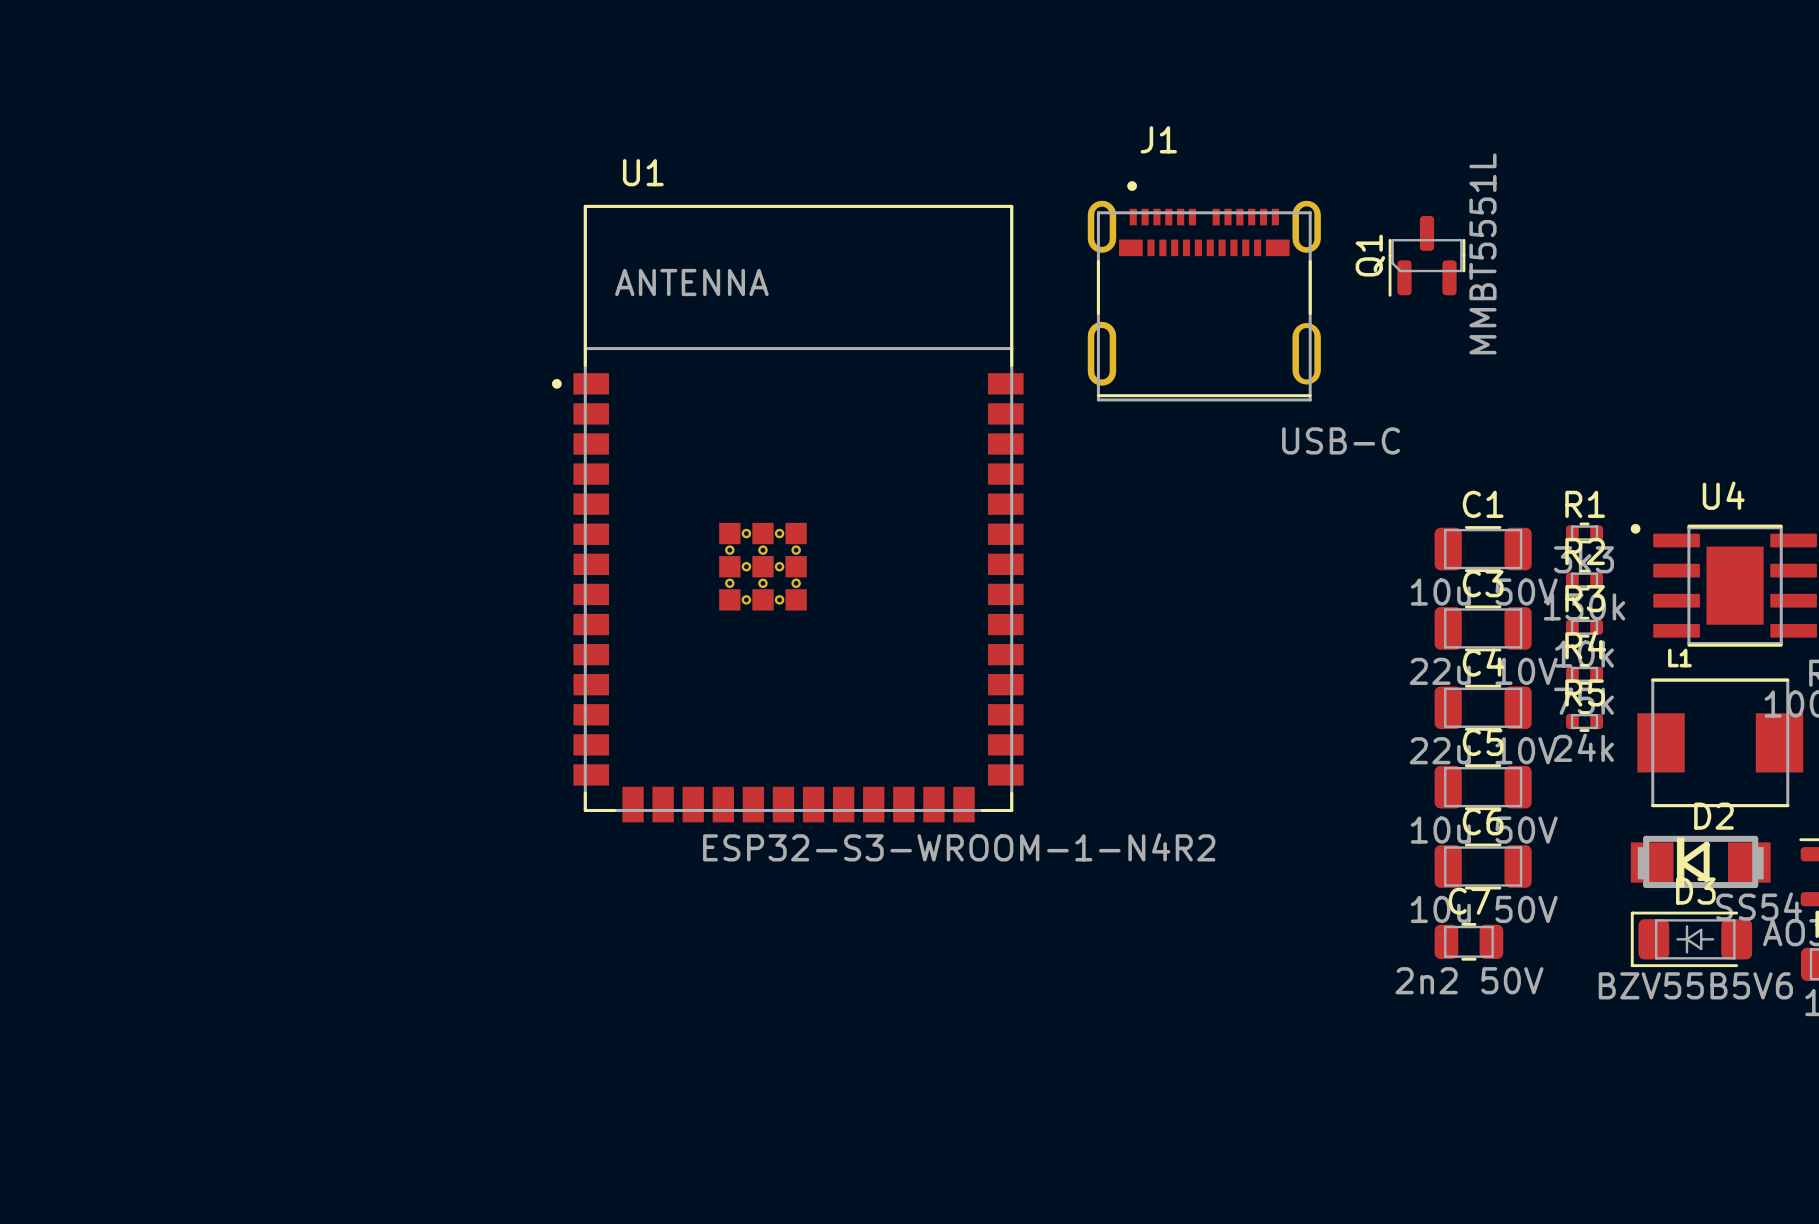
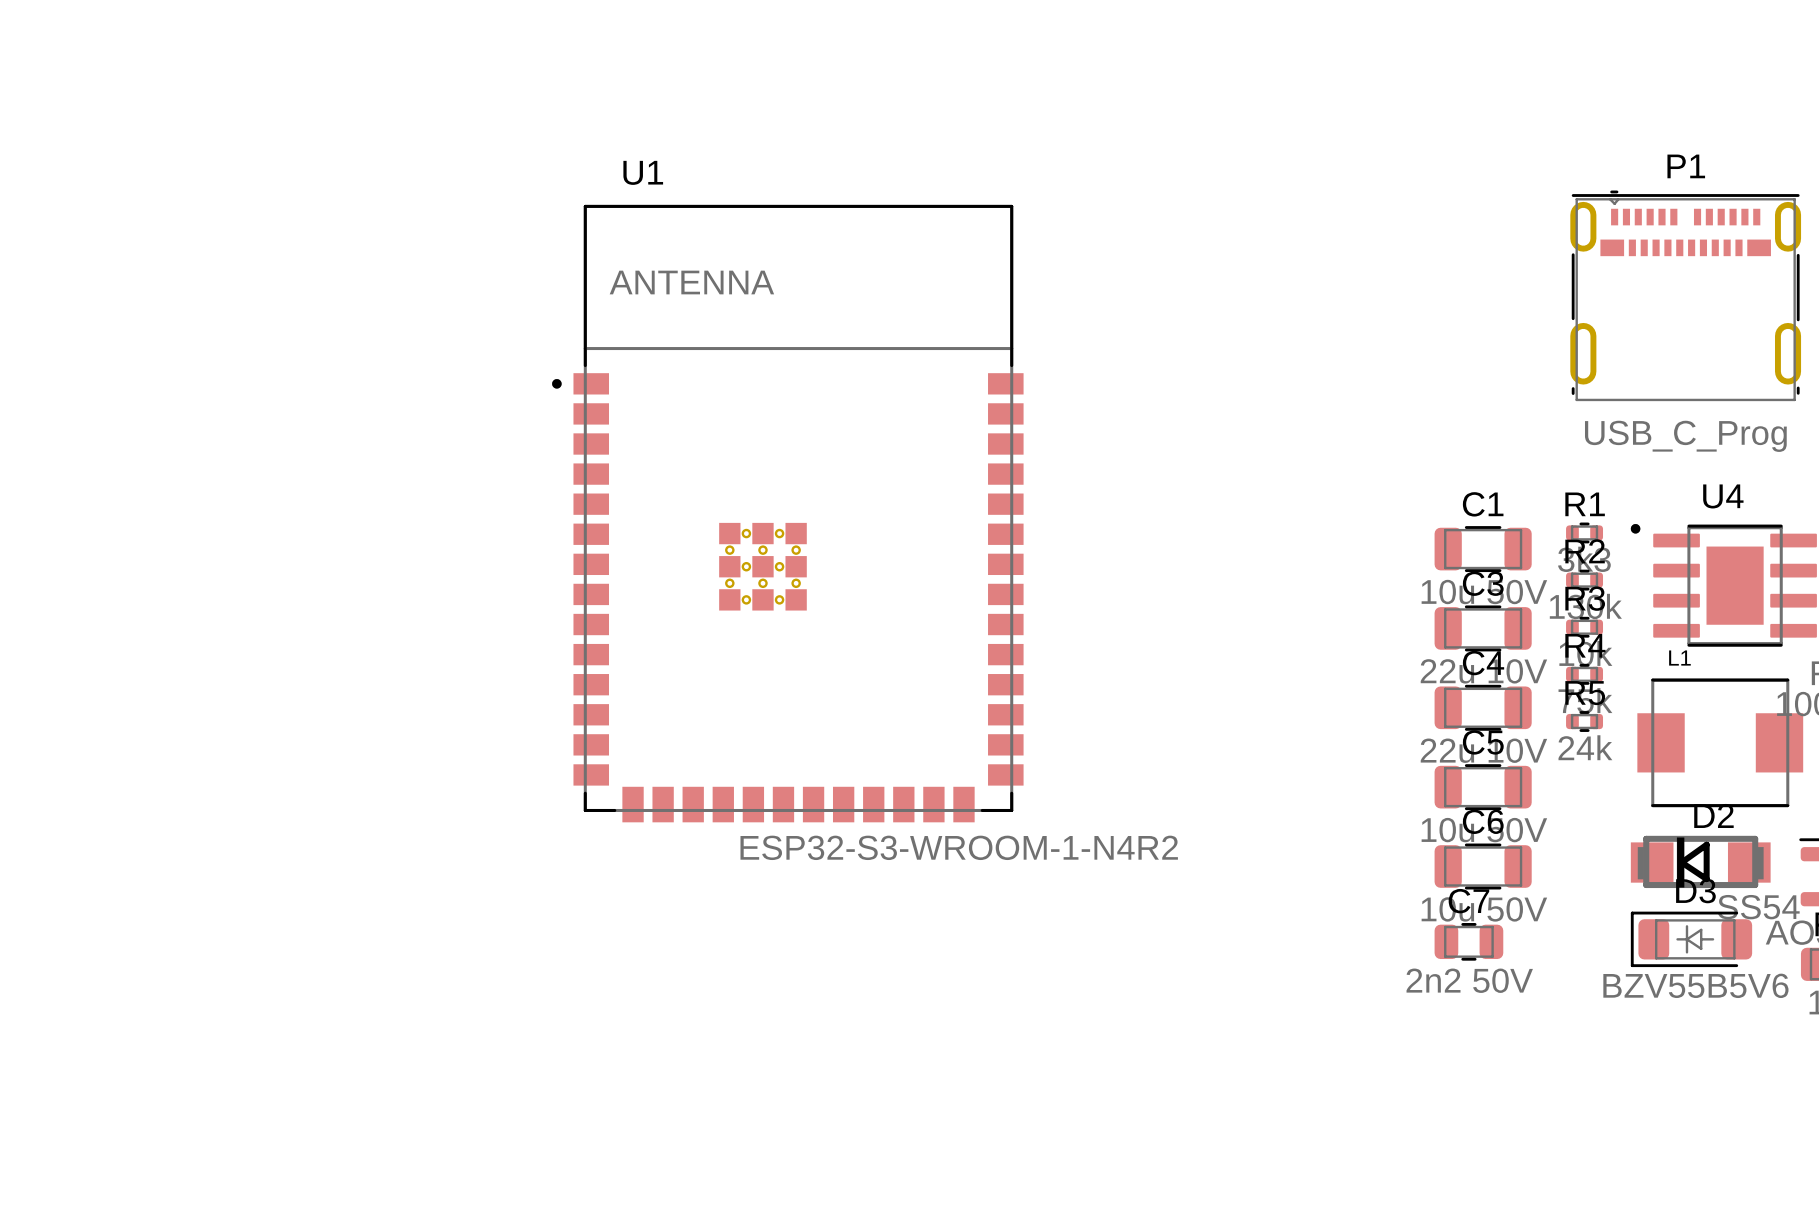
Q1: MMBT5551L (1426, 256) -> none
J1: USB-C (1204, 291) -> none
P1: none -> USB_C_Prog (1685, 295)

